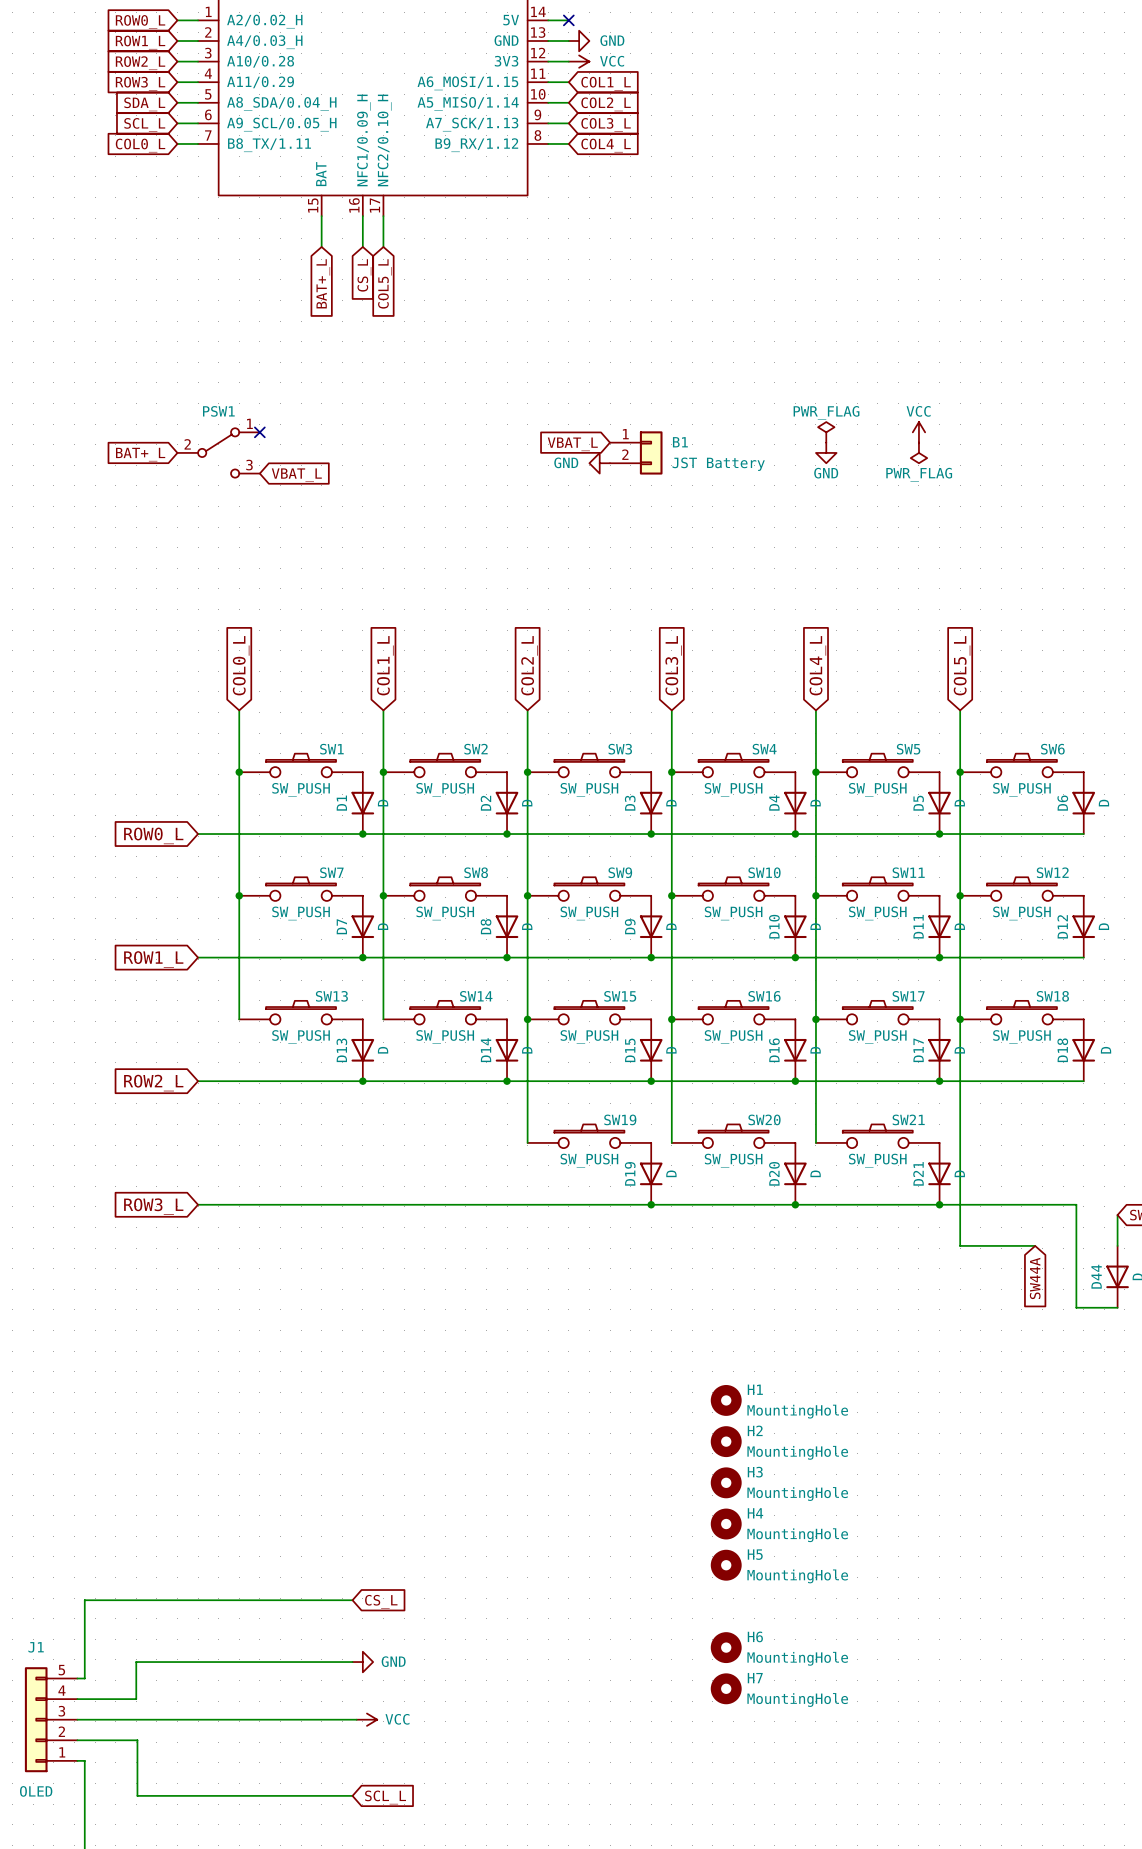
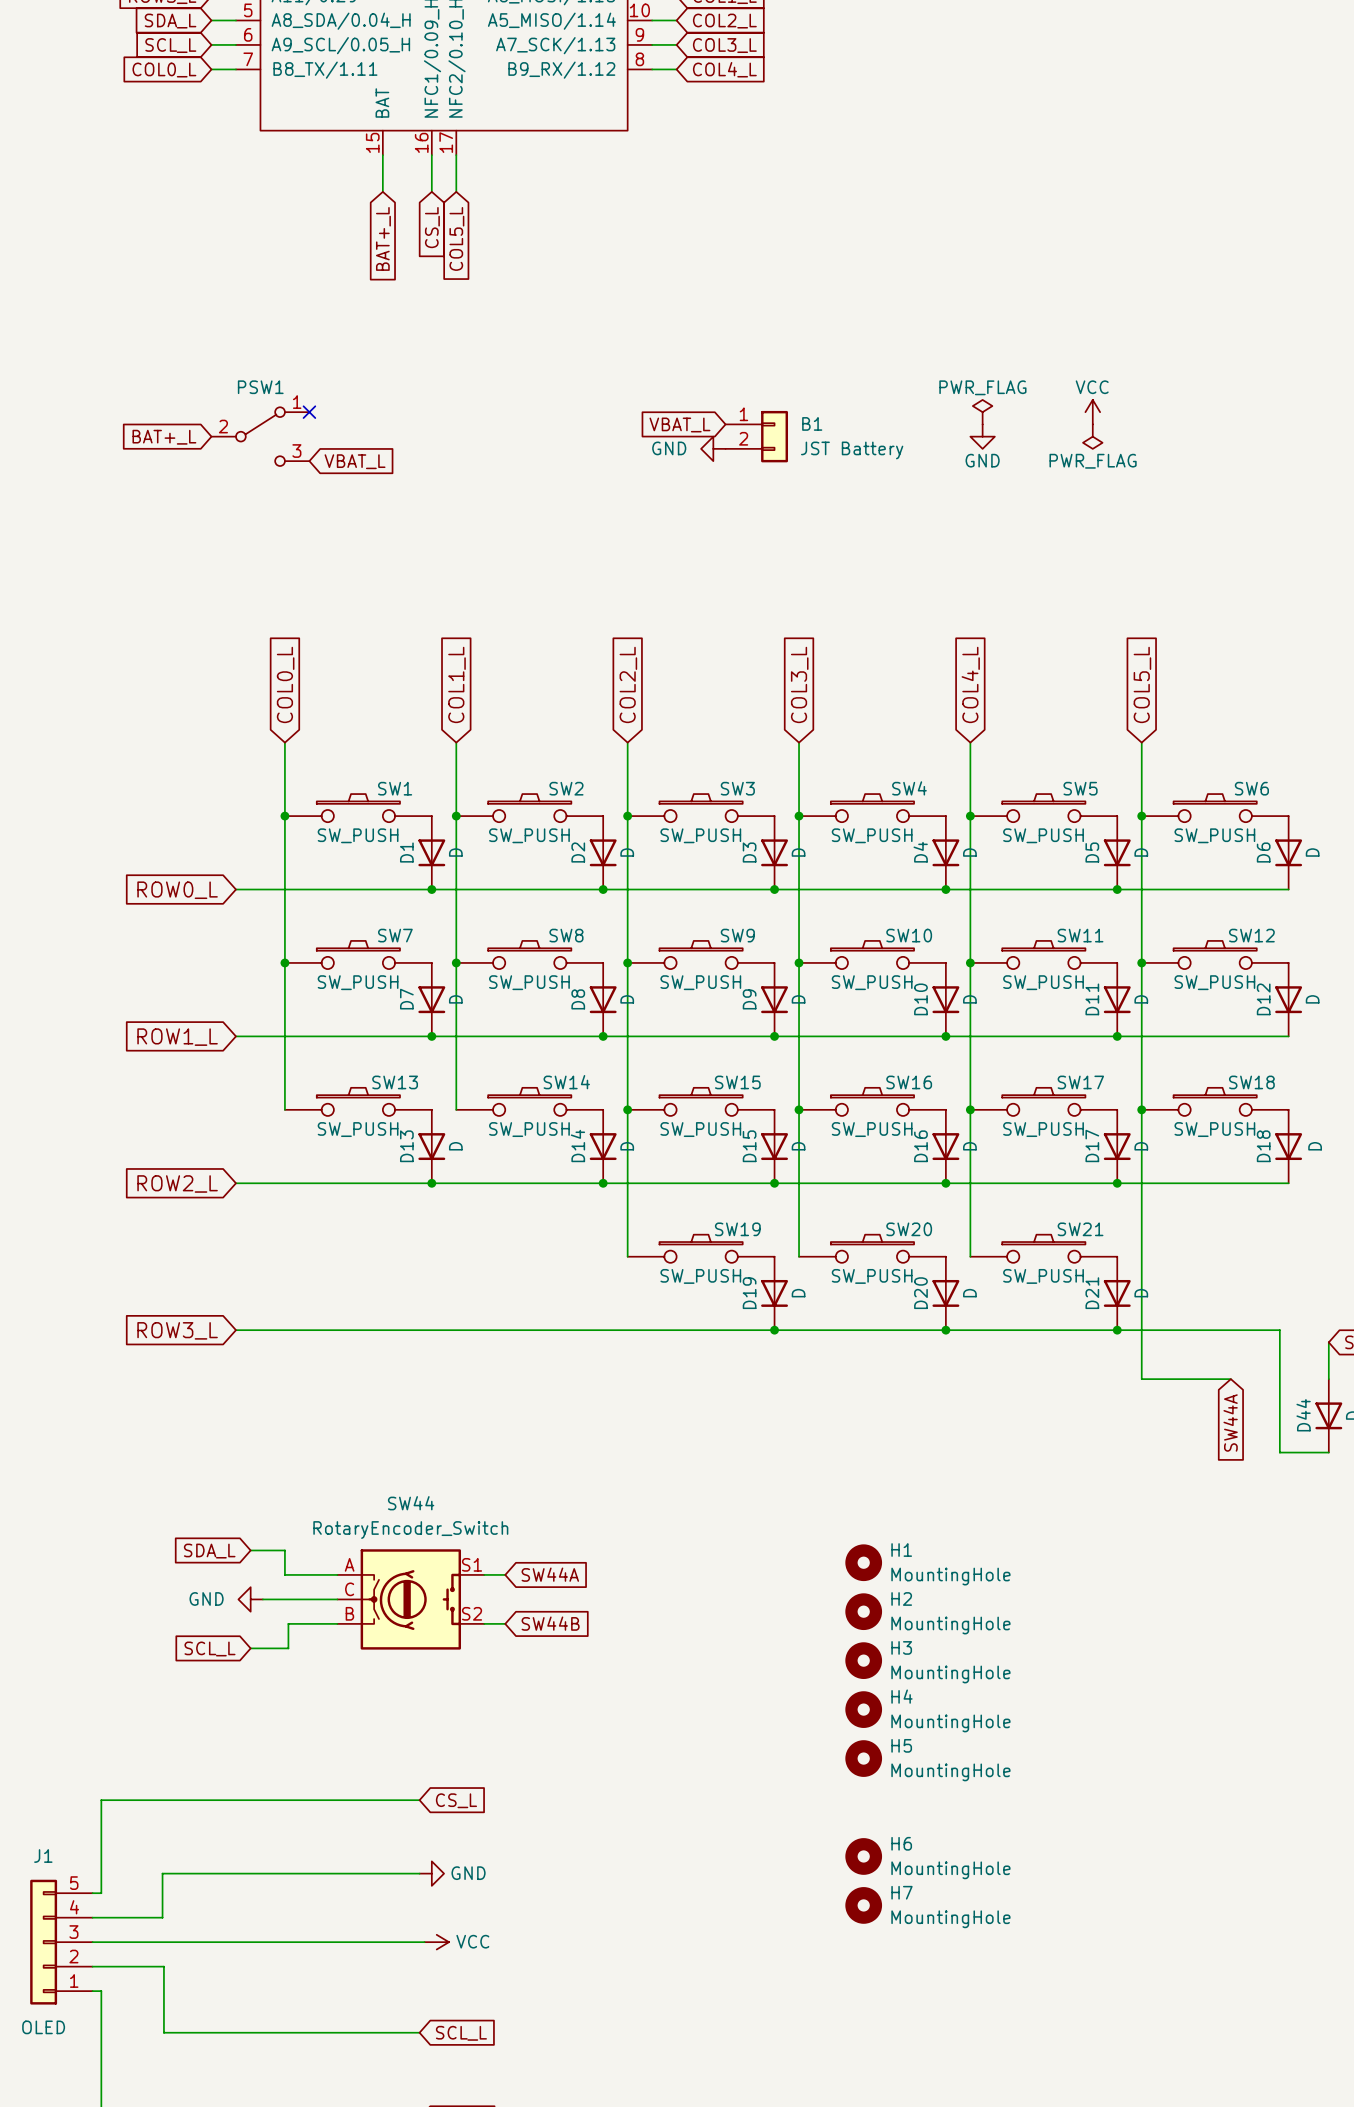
wire: none -> (250, 1550) (284, 1550) (284, 1574) (337, 1574)
global label: none -> SDA_L (209, 1551)
wire: none -> (484, 1574) (505, 1574)
global label: none -> SW44A (550, 1574)
power symbol: none -> GND (250, 1599)
wire: none -> (262, 1599) (337, 1599)
SW44: none -> RotaryEncoder_Switch (410, 1599)
wire: none -> (337, 1623) (288, 1623) (288, 1648) (250, 1648)
wire: none -> (484, 1623) (505, 1623)
global label: none -> SW44B (550, 1623)
global label: none -> SCL_L (210, 1648)

